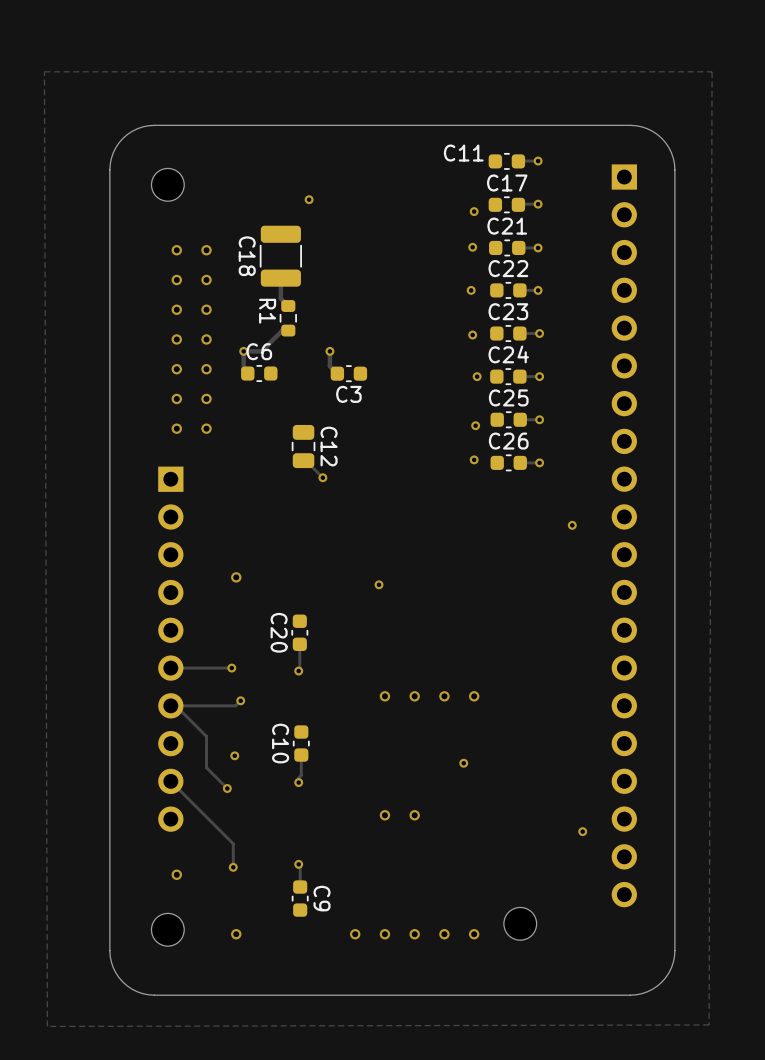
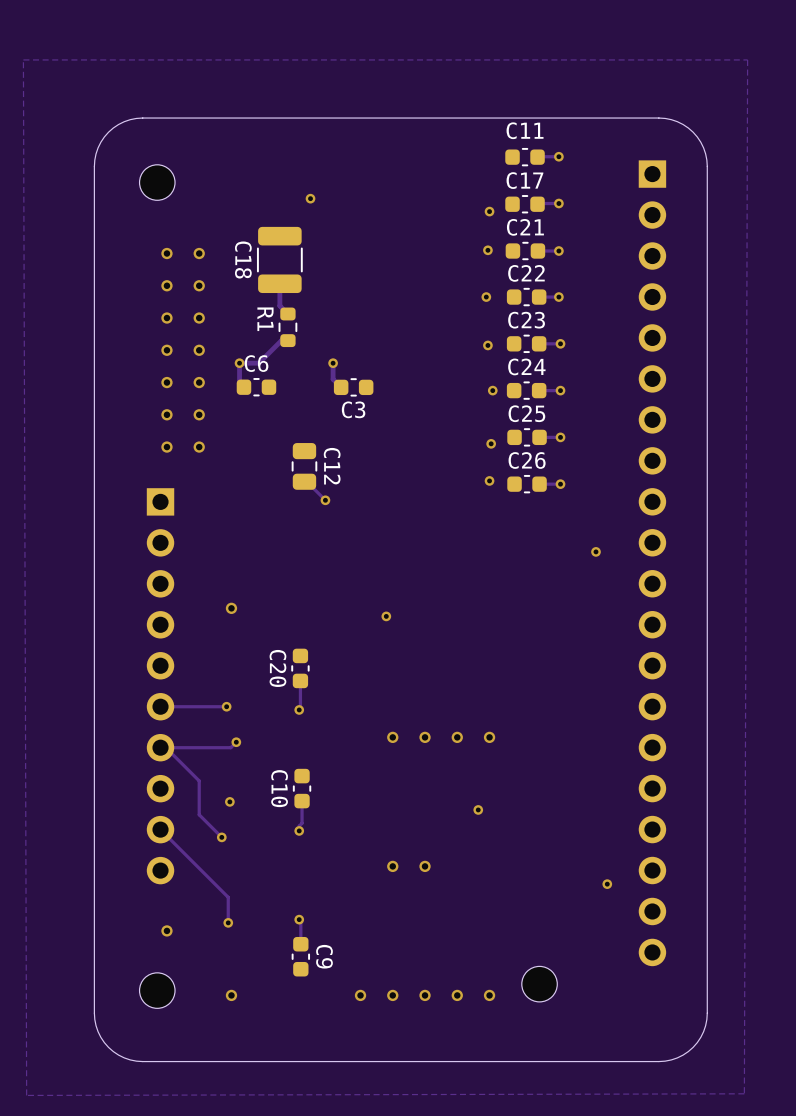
C11 name position: C11 (463, 153) -> C11 (525, 130)

